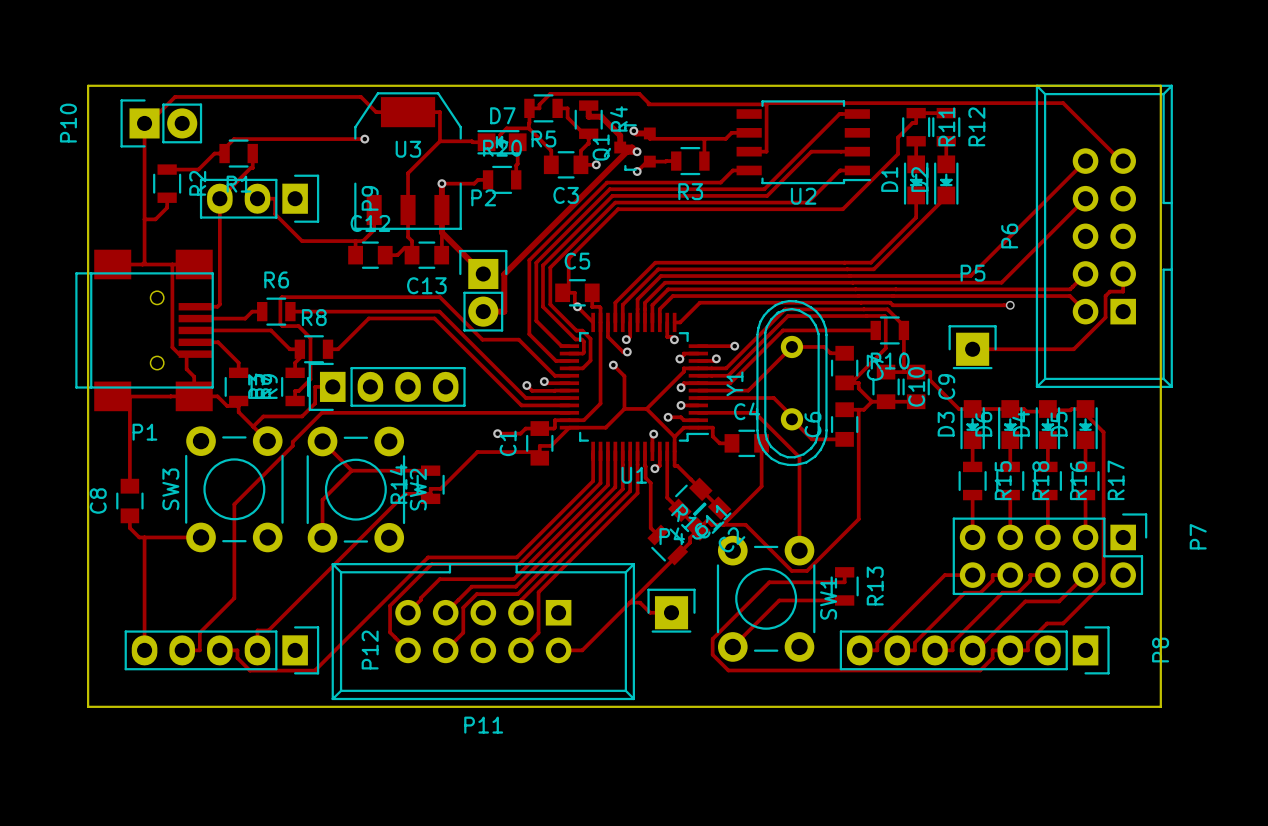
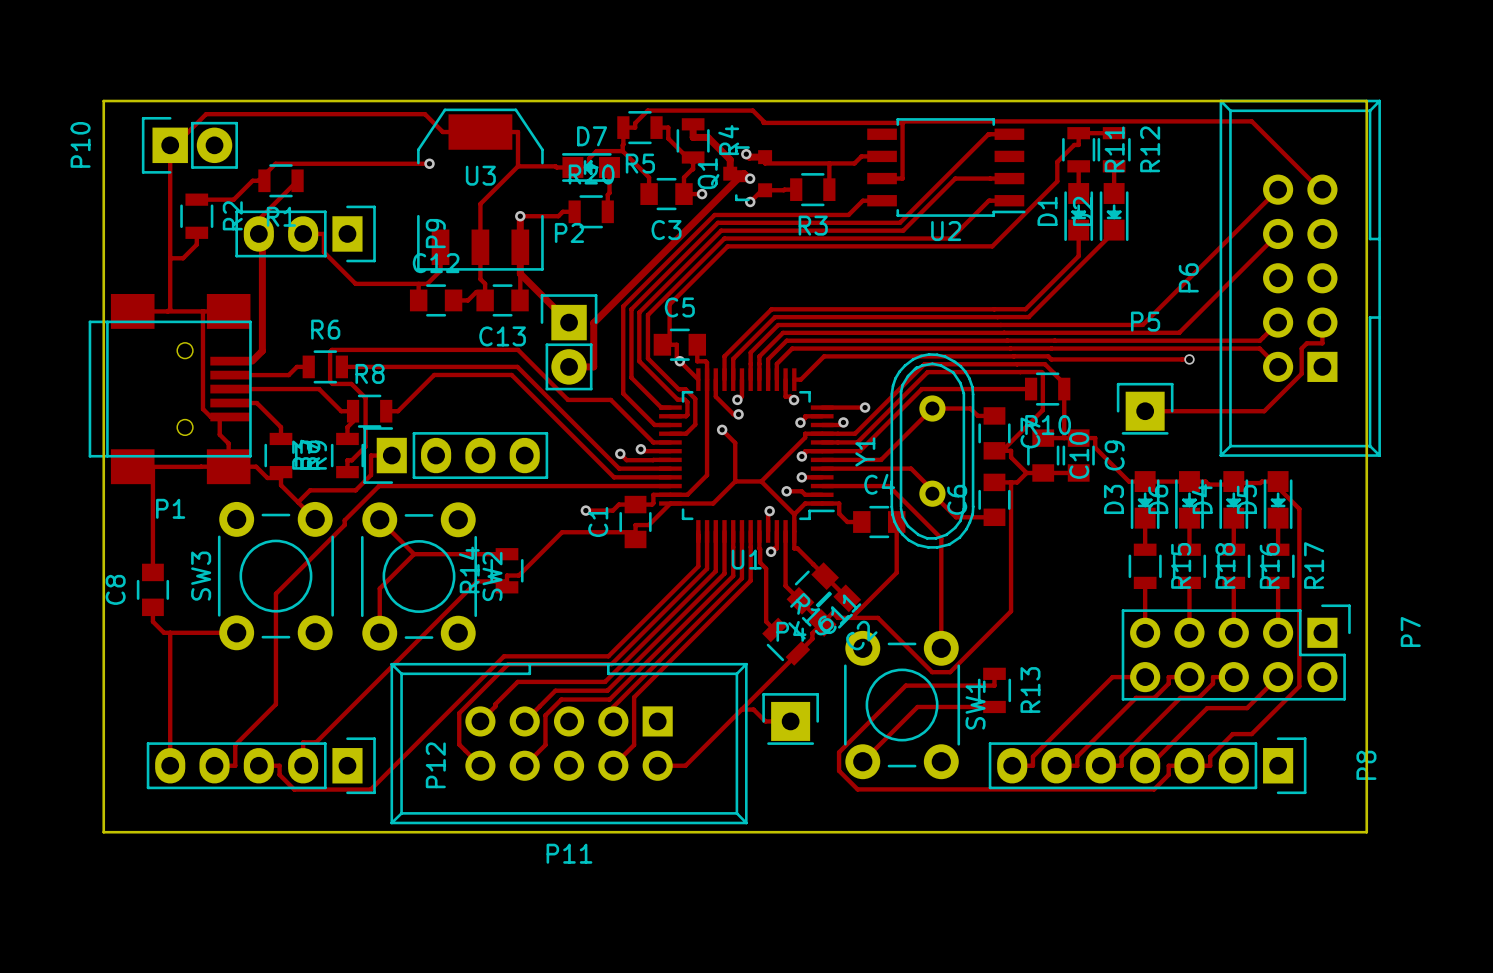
track: (252, 153) (252, 167) (219, 198) (219, 304) (214, 306) -> (262, 234) (262, 350) (252, 361)
track: none -> (297, 180) (258, 219) (258, 233)

